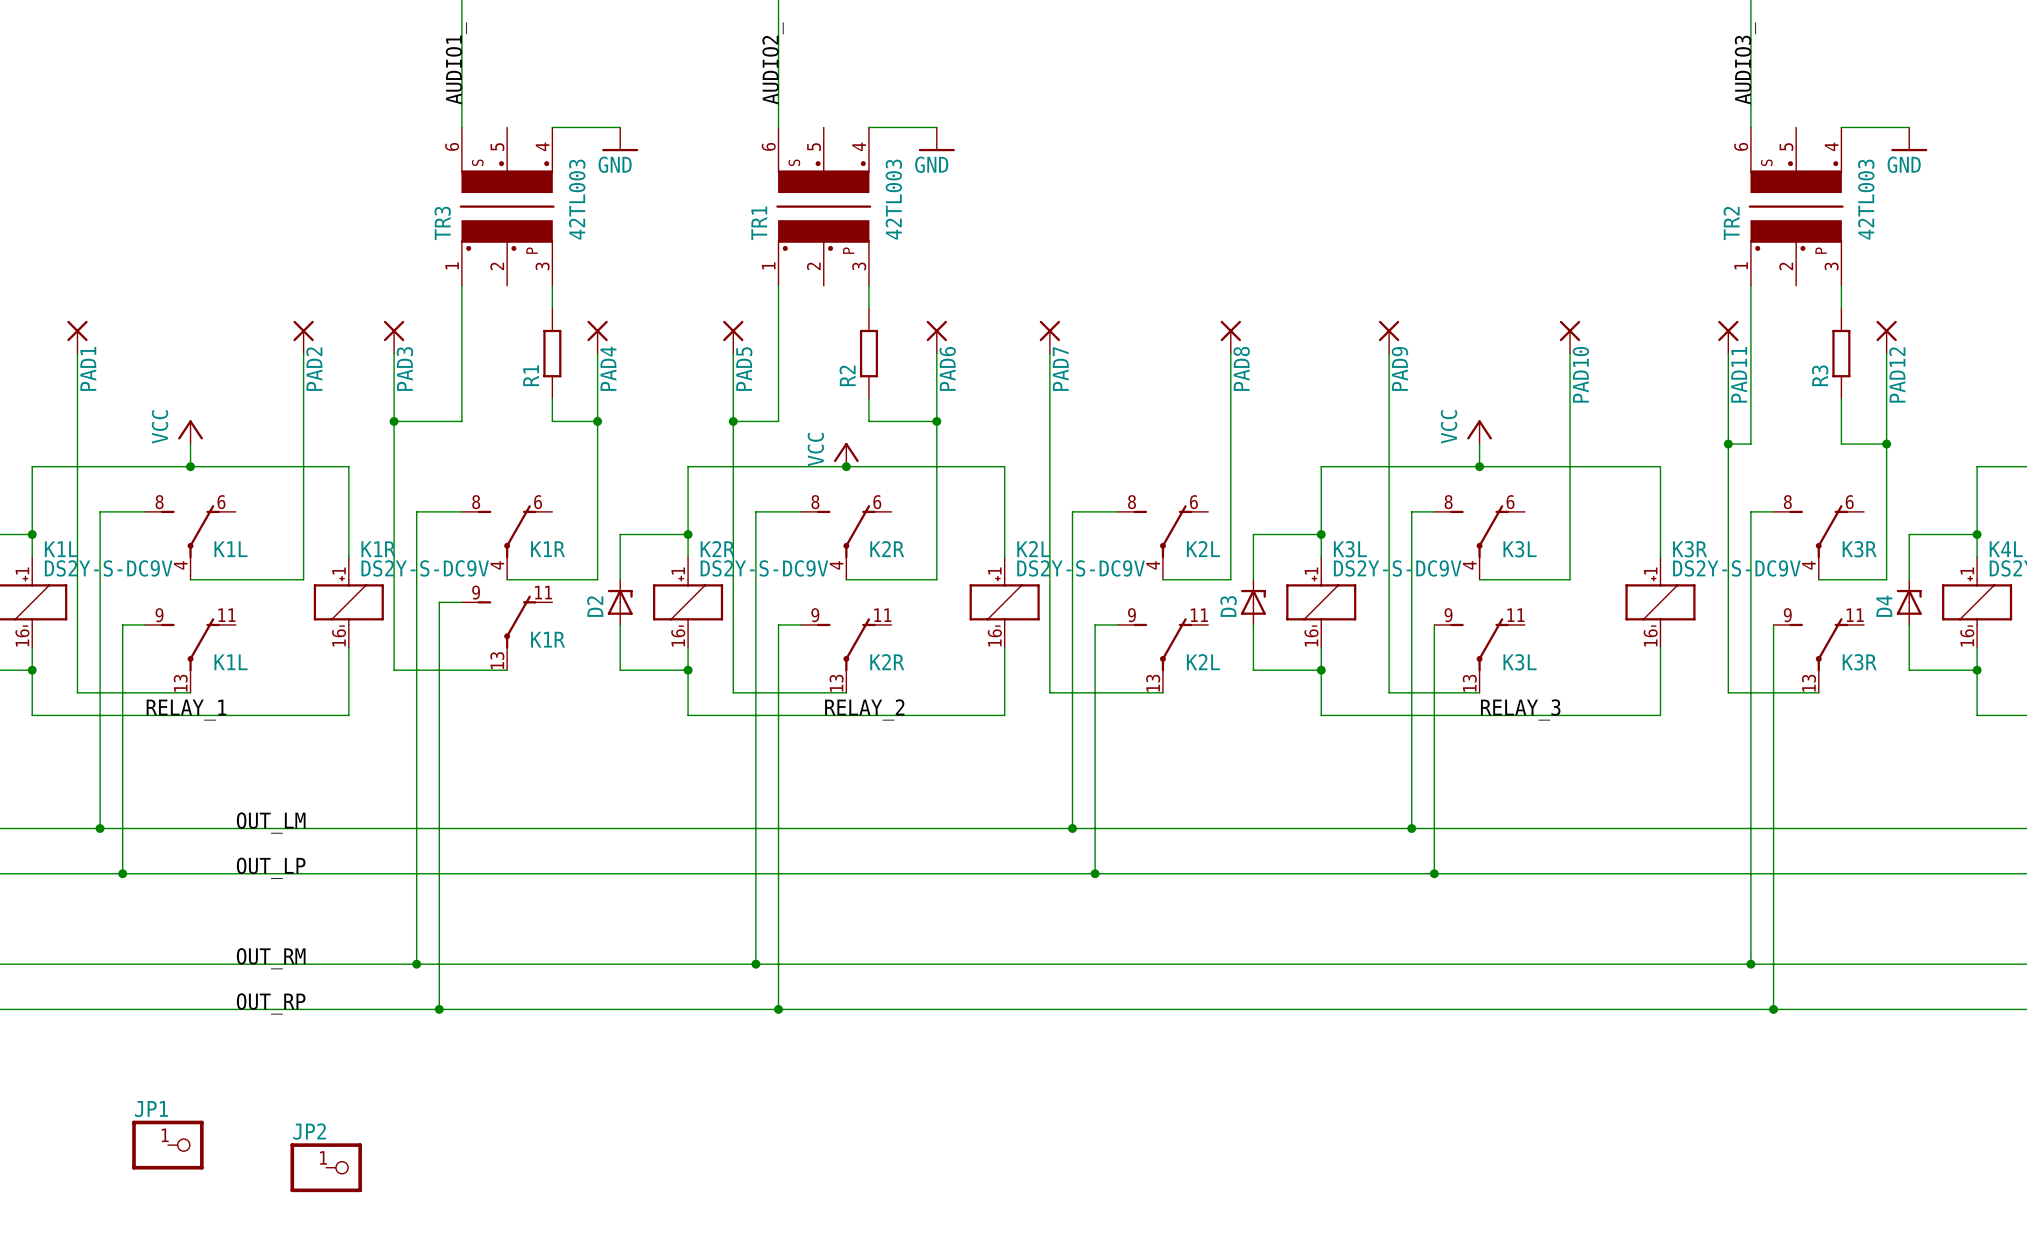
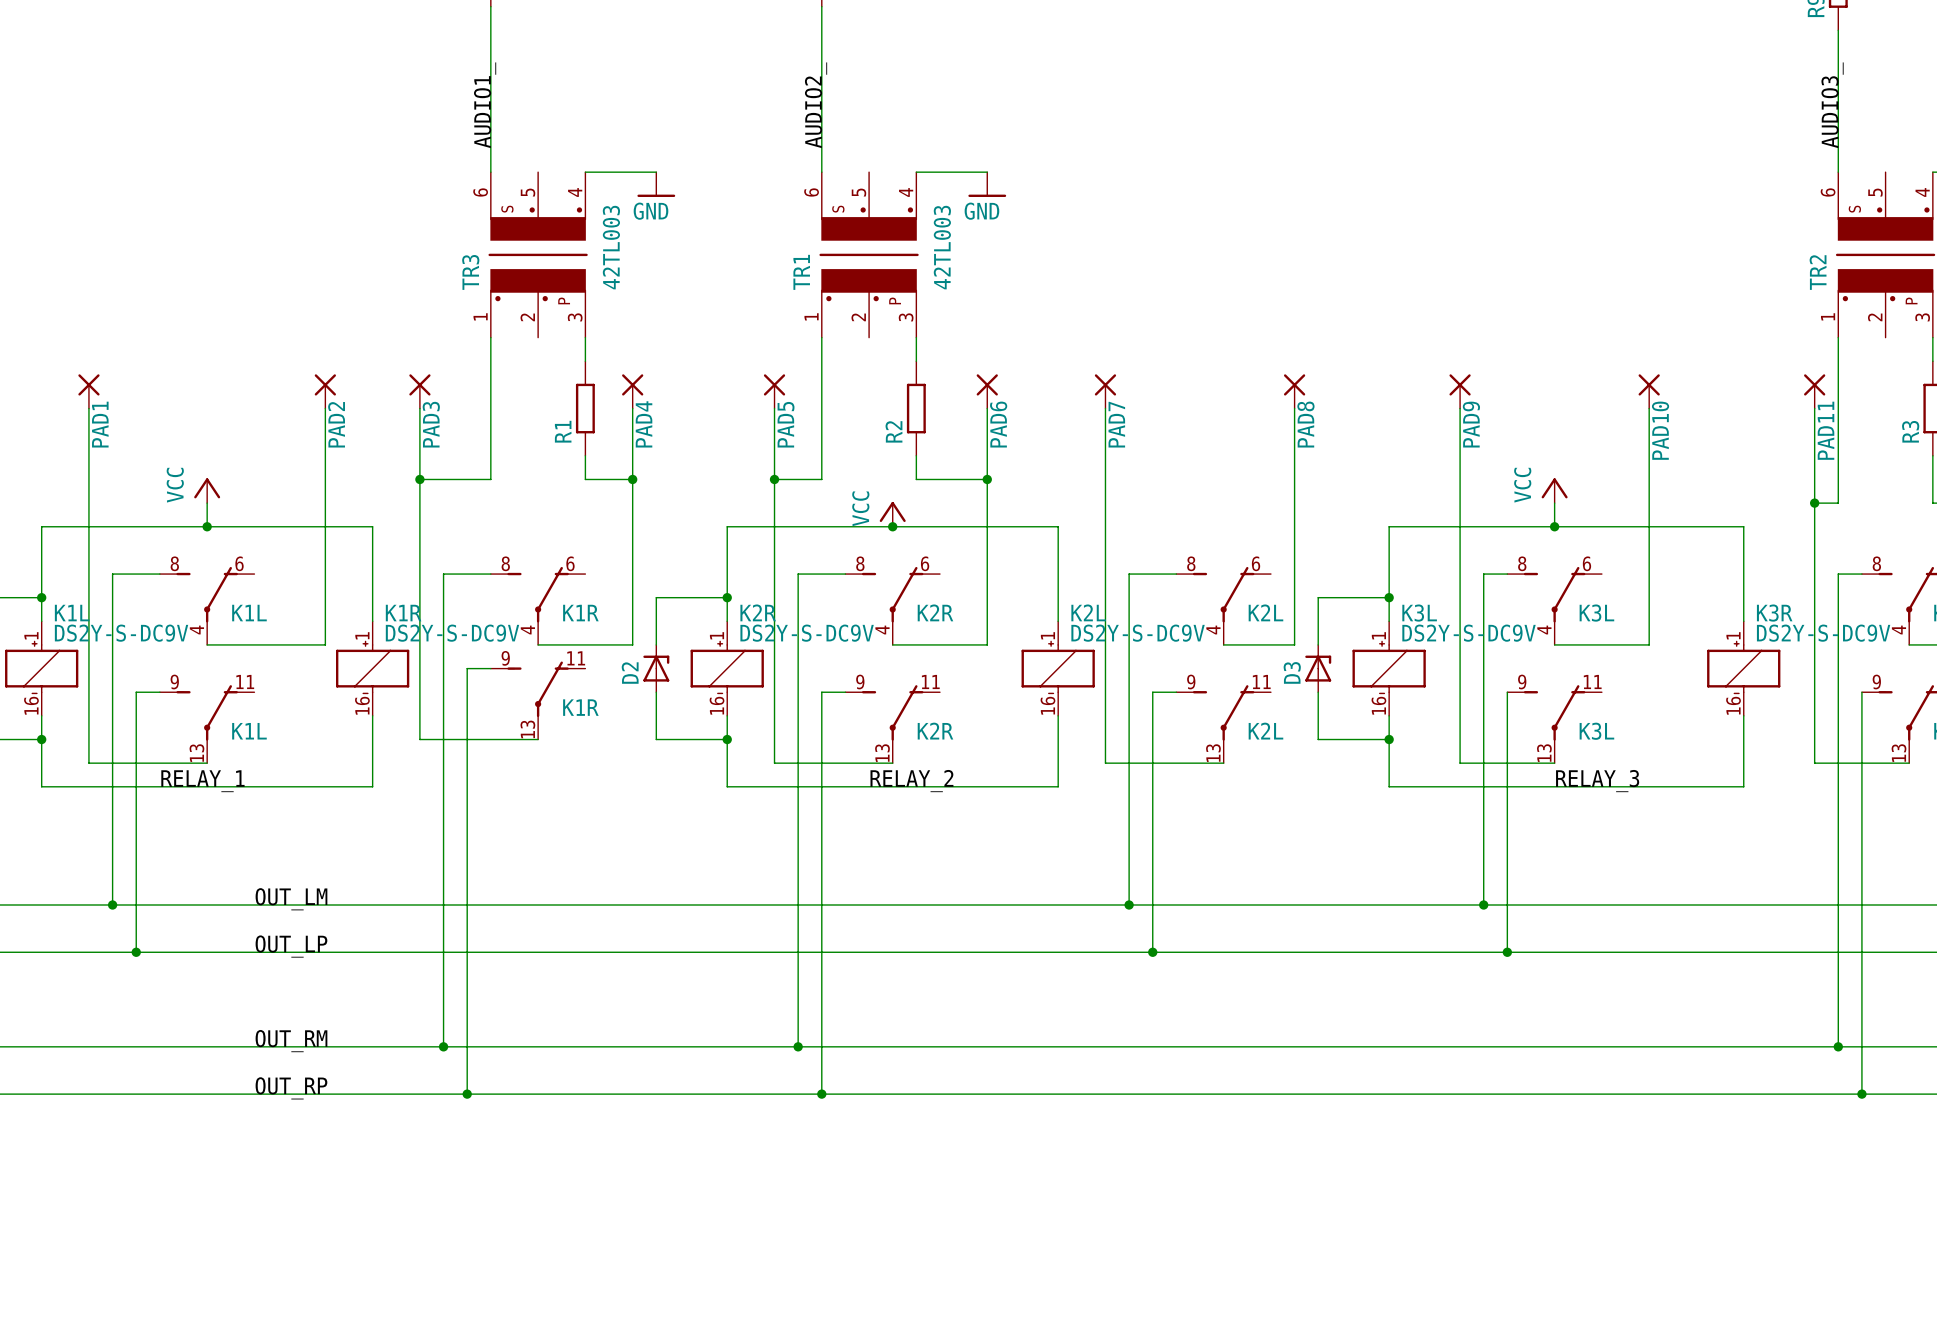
JP1: (167, 1145) -> none
JP2: (326, 1167) -> none

